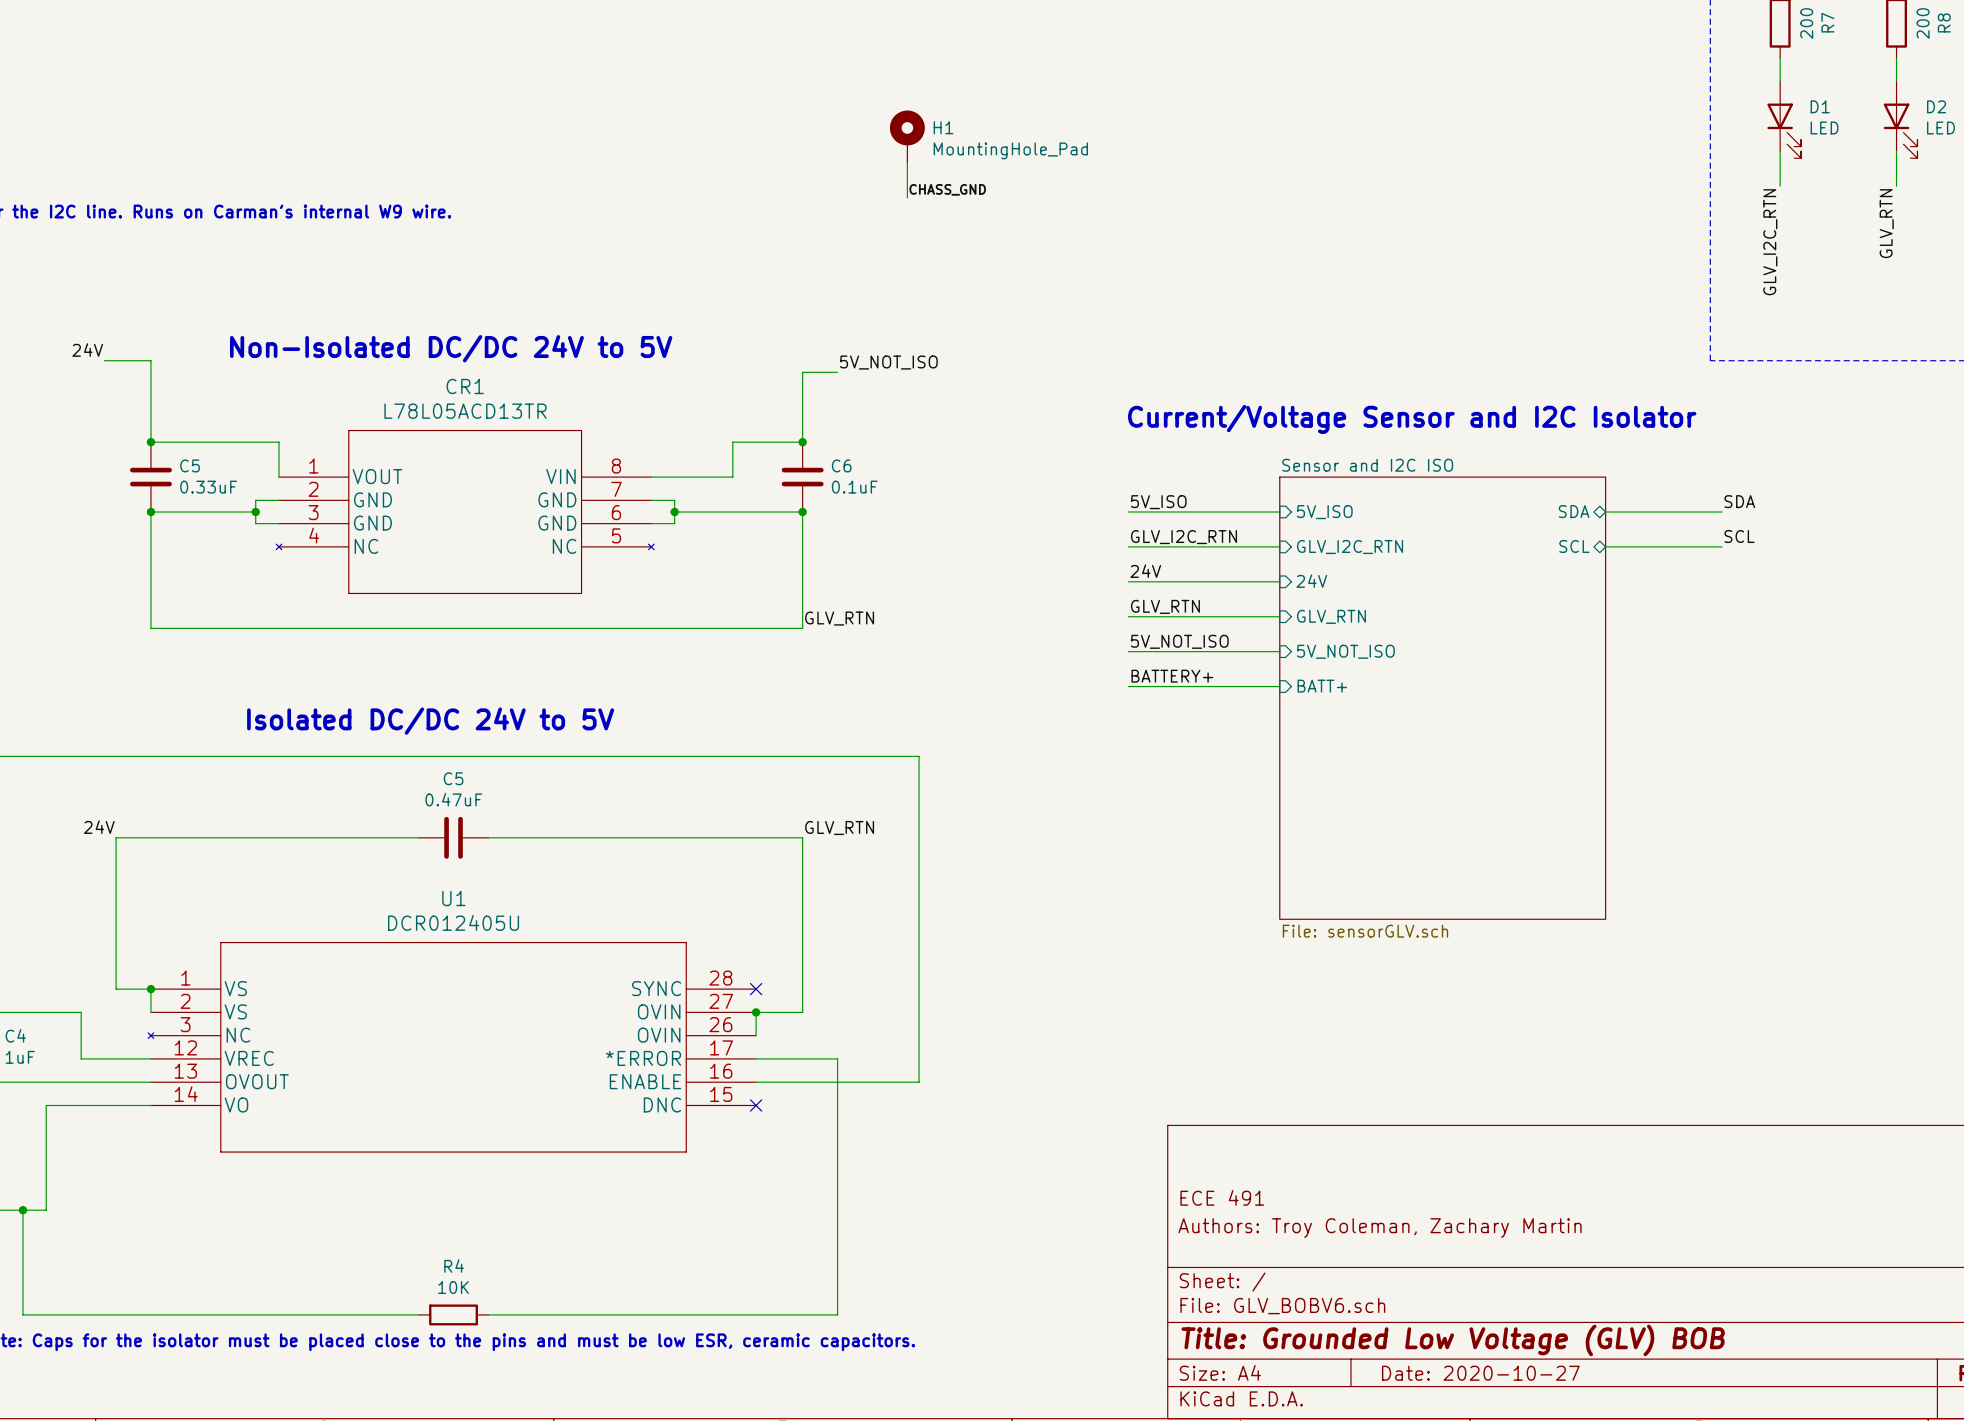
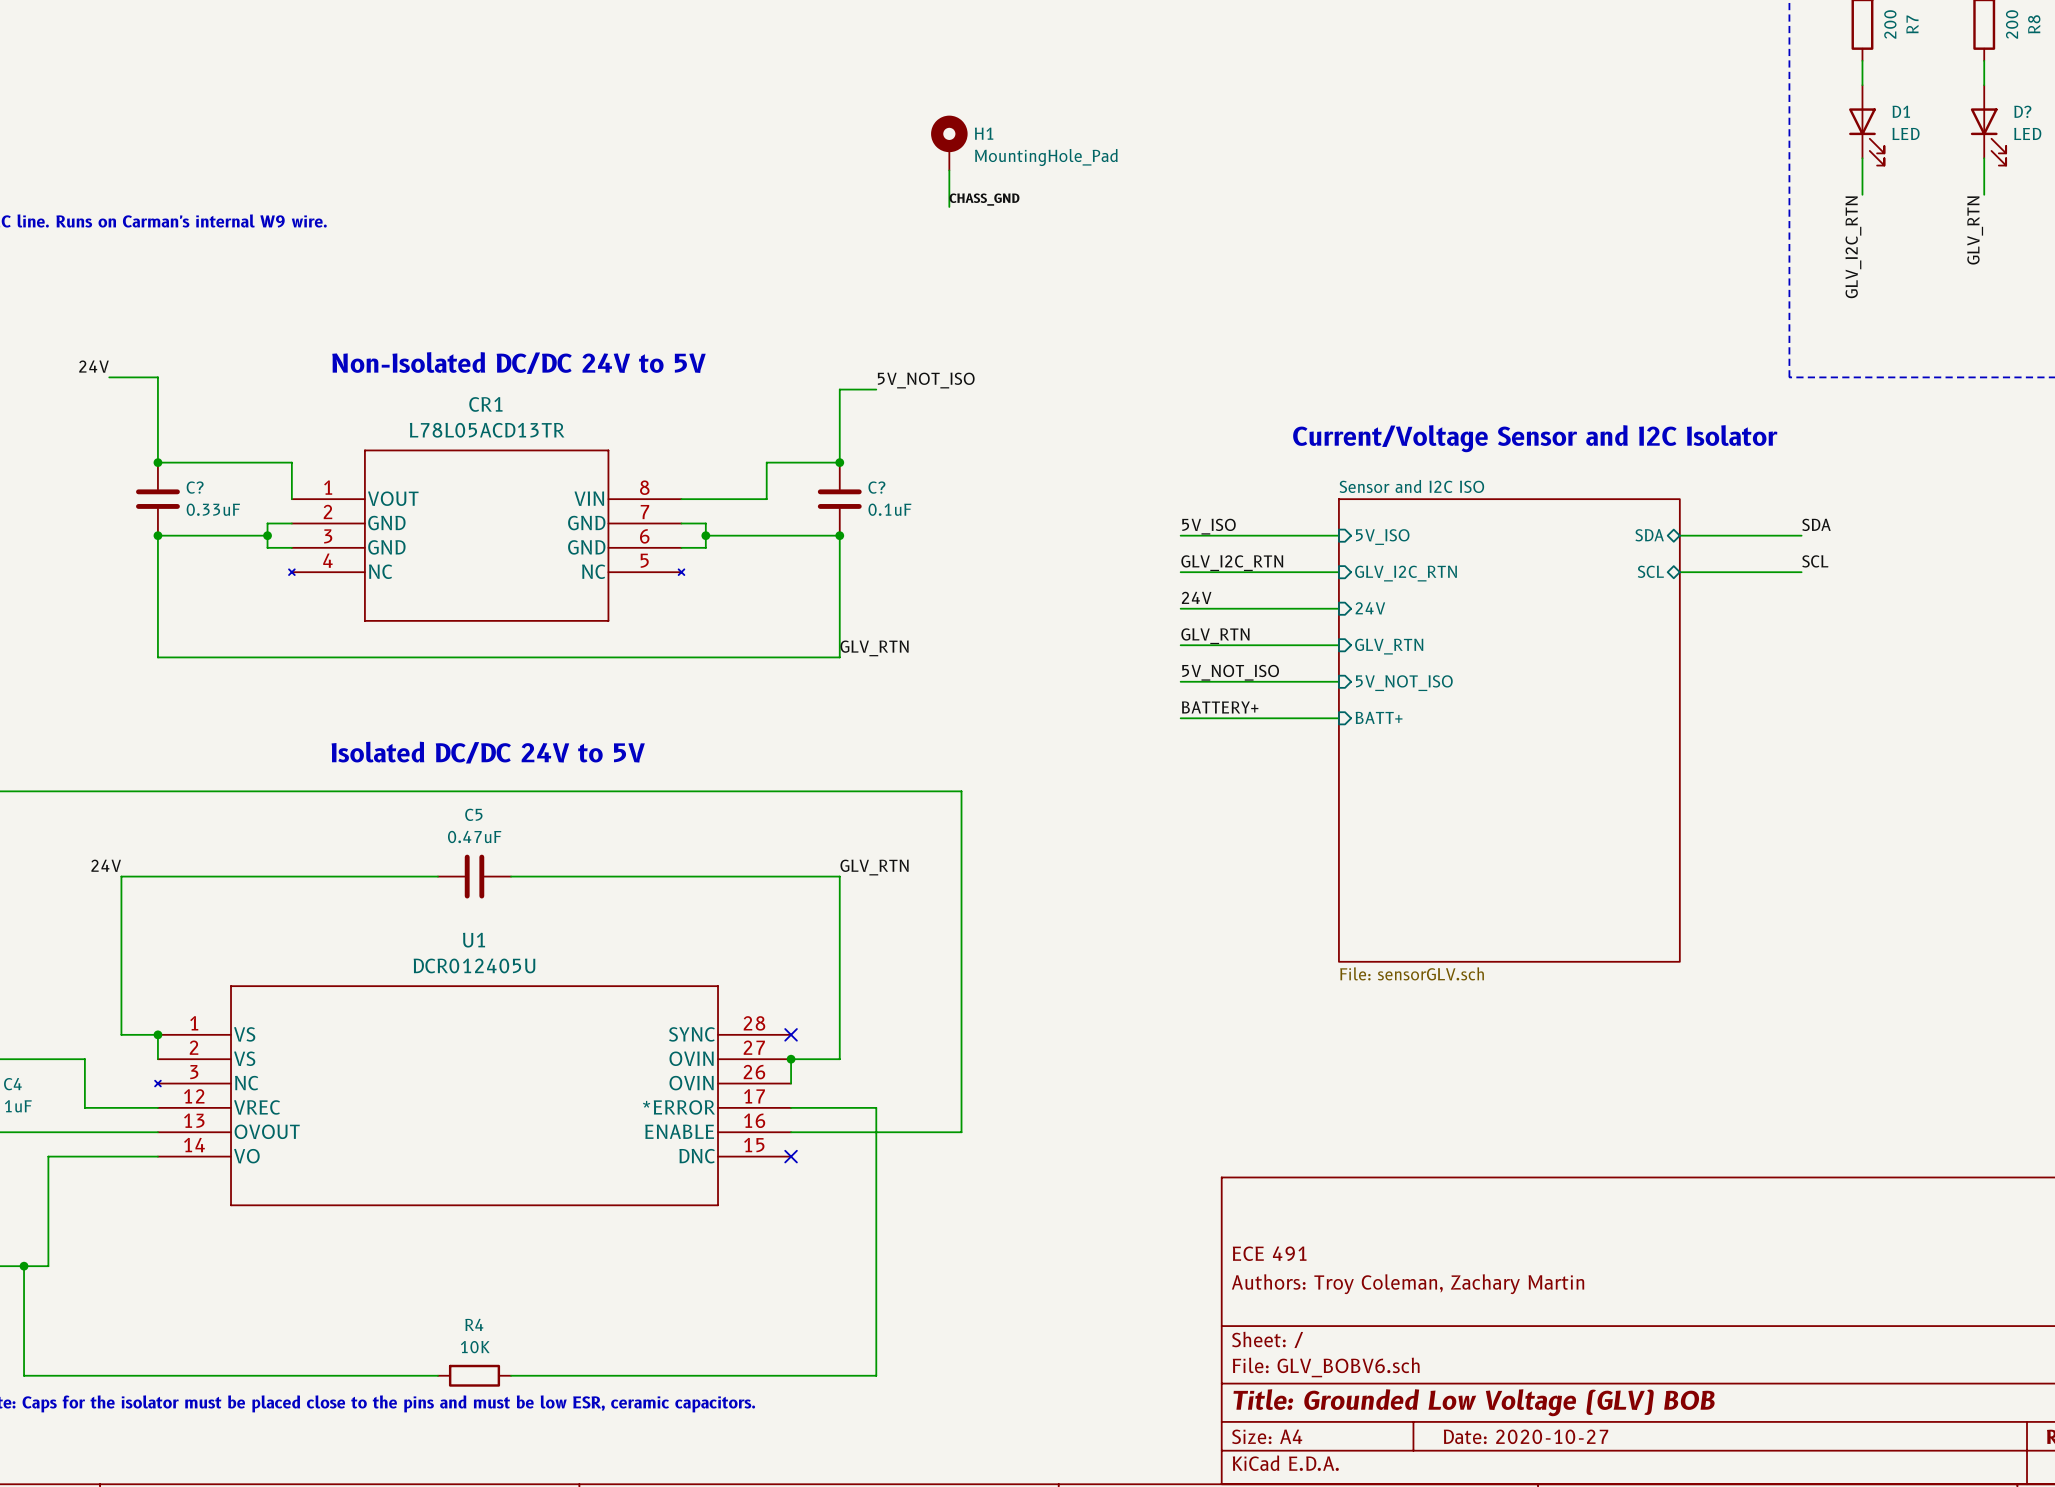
D2 name: D2 (1936, 106) -> D? (2022, 111)
C5 name: C5 (190, 465) -> C? (195, 487)
C6 name: C6 (841, 465) -> C? (876, 487)

